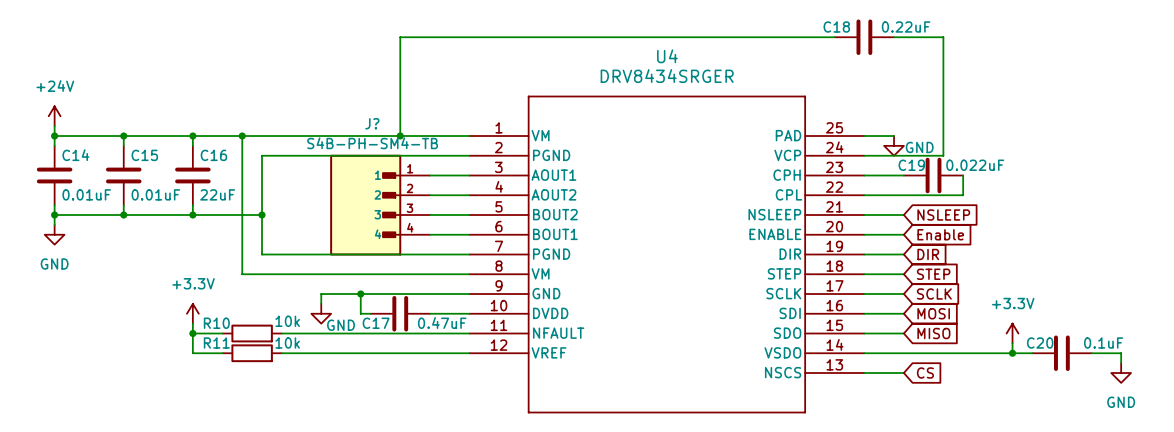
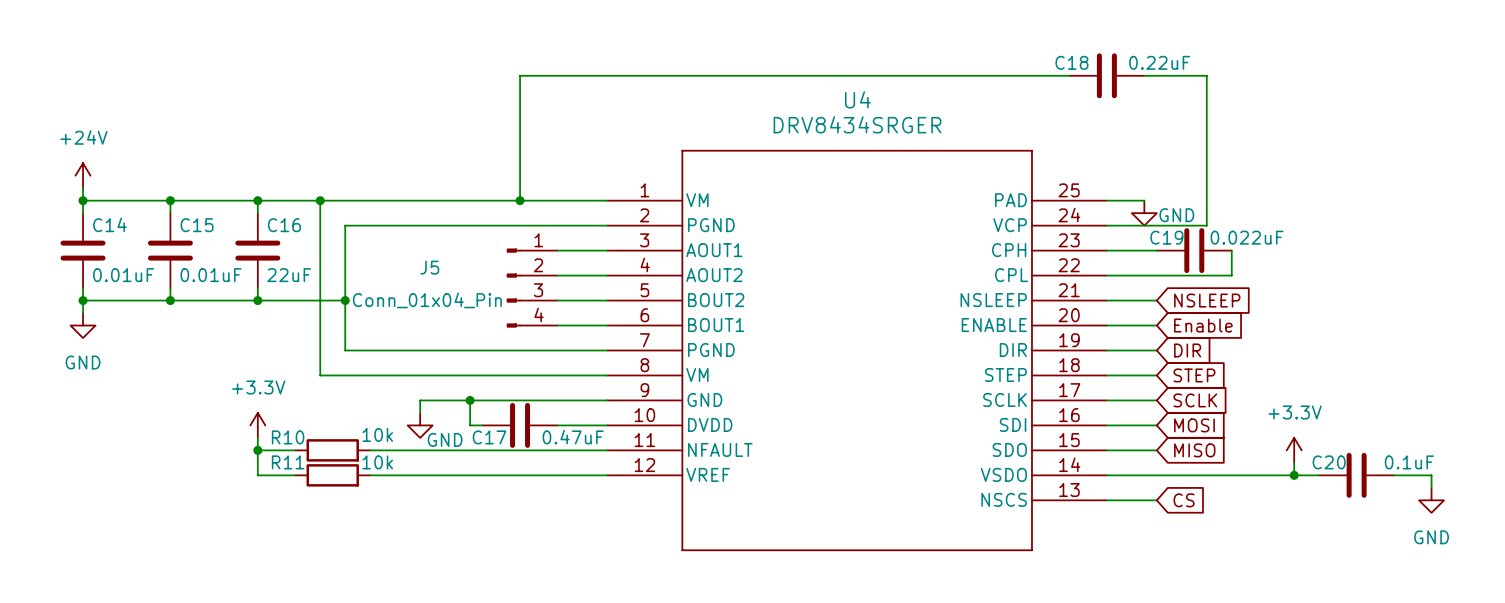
J?: S4B-PH-SM4-TB (380, 205) -> none
J5: none -> Conn_01x04_Pin (532, 288)

